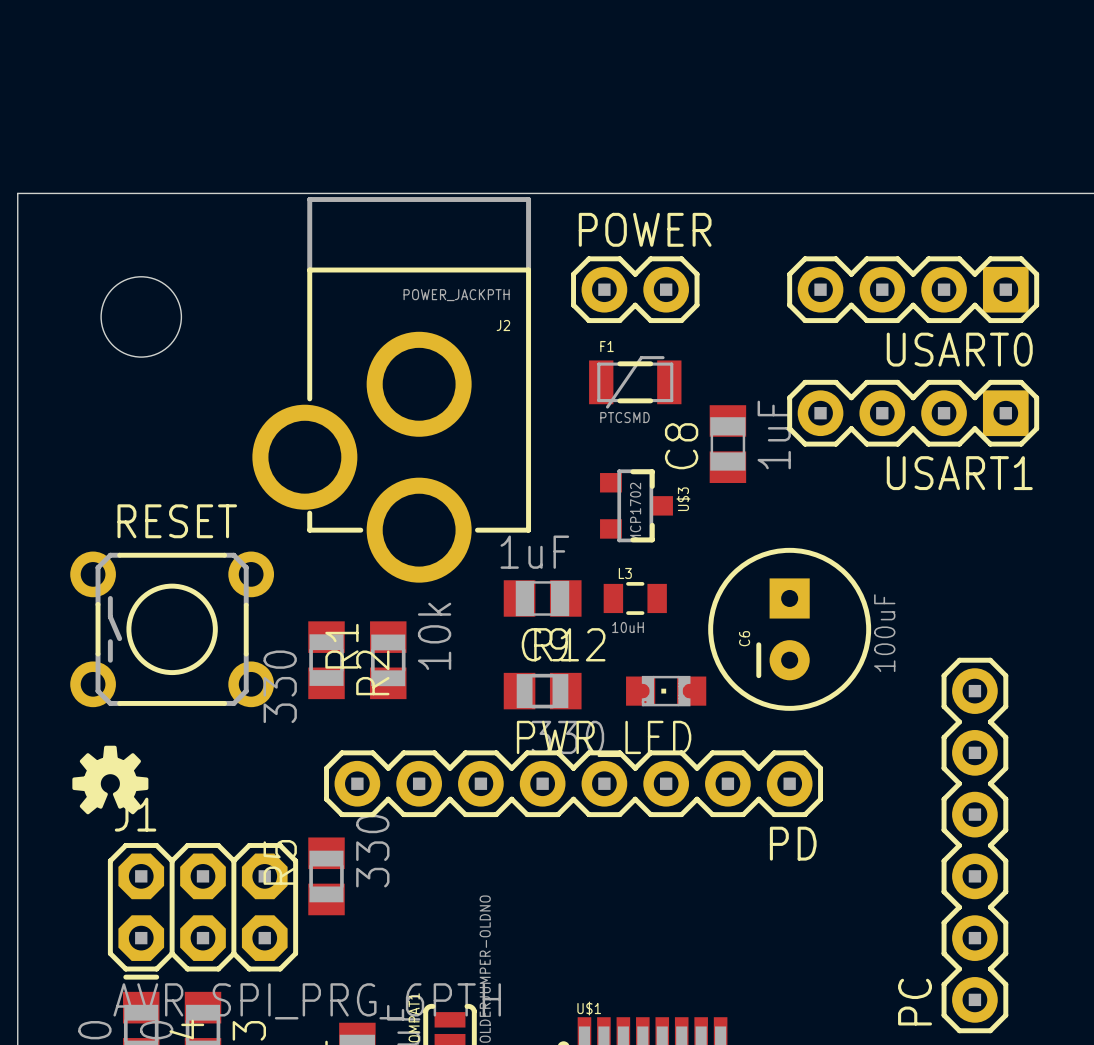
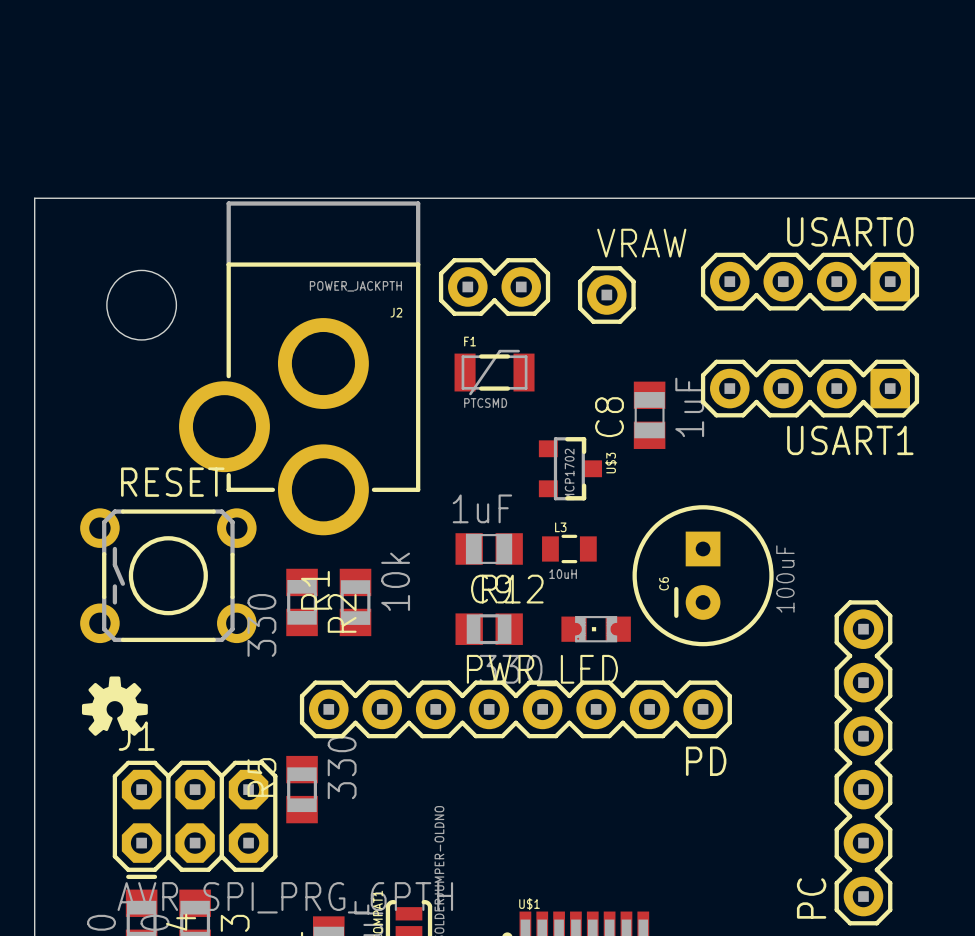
POWER: (635, 289) -> none
part: none -> (494, 286)
VRAW: none -> (606, 294)
USART0 name position: USART0 (959, 349) -> USART0 (850, 231)
F1 position: (635, 382) -> (494, 372)
J2 position: (391, 389) -> (299, 368)

